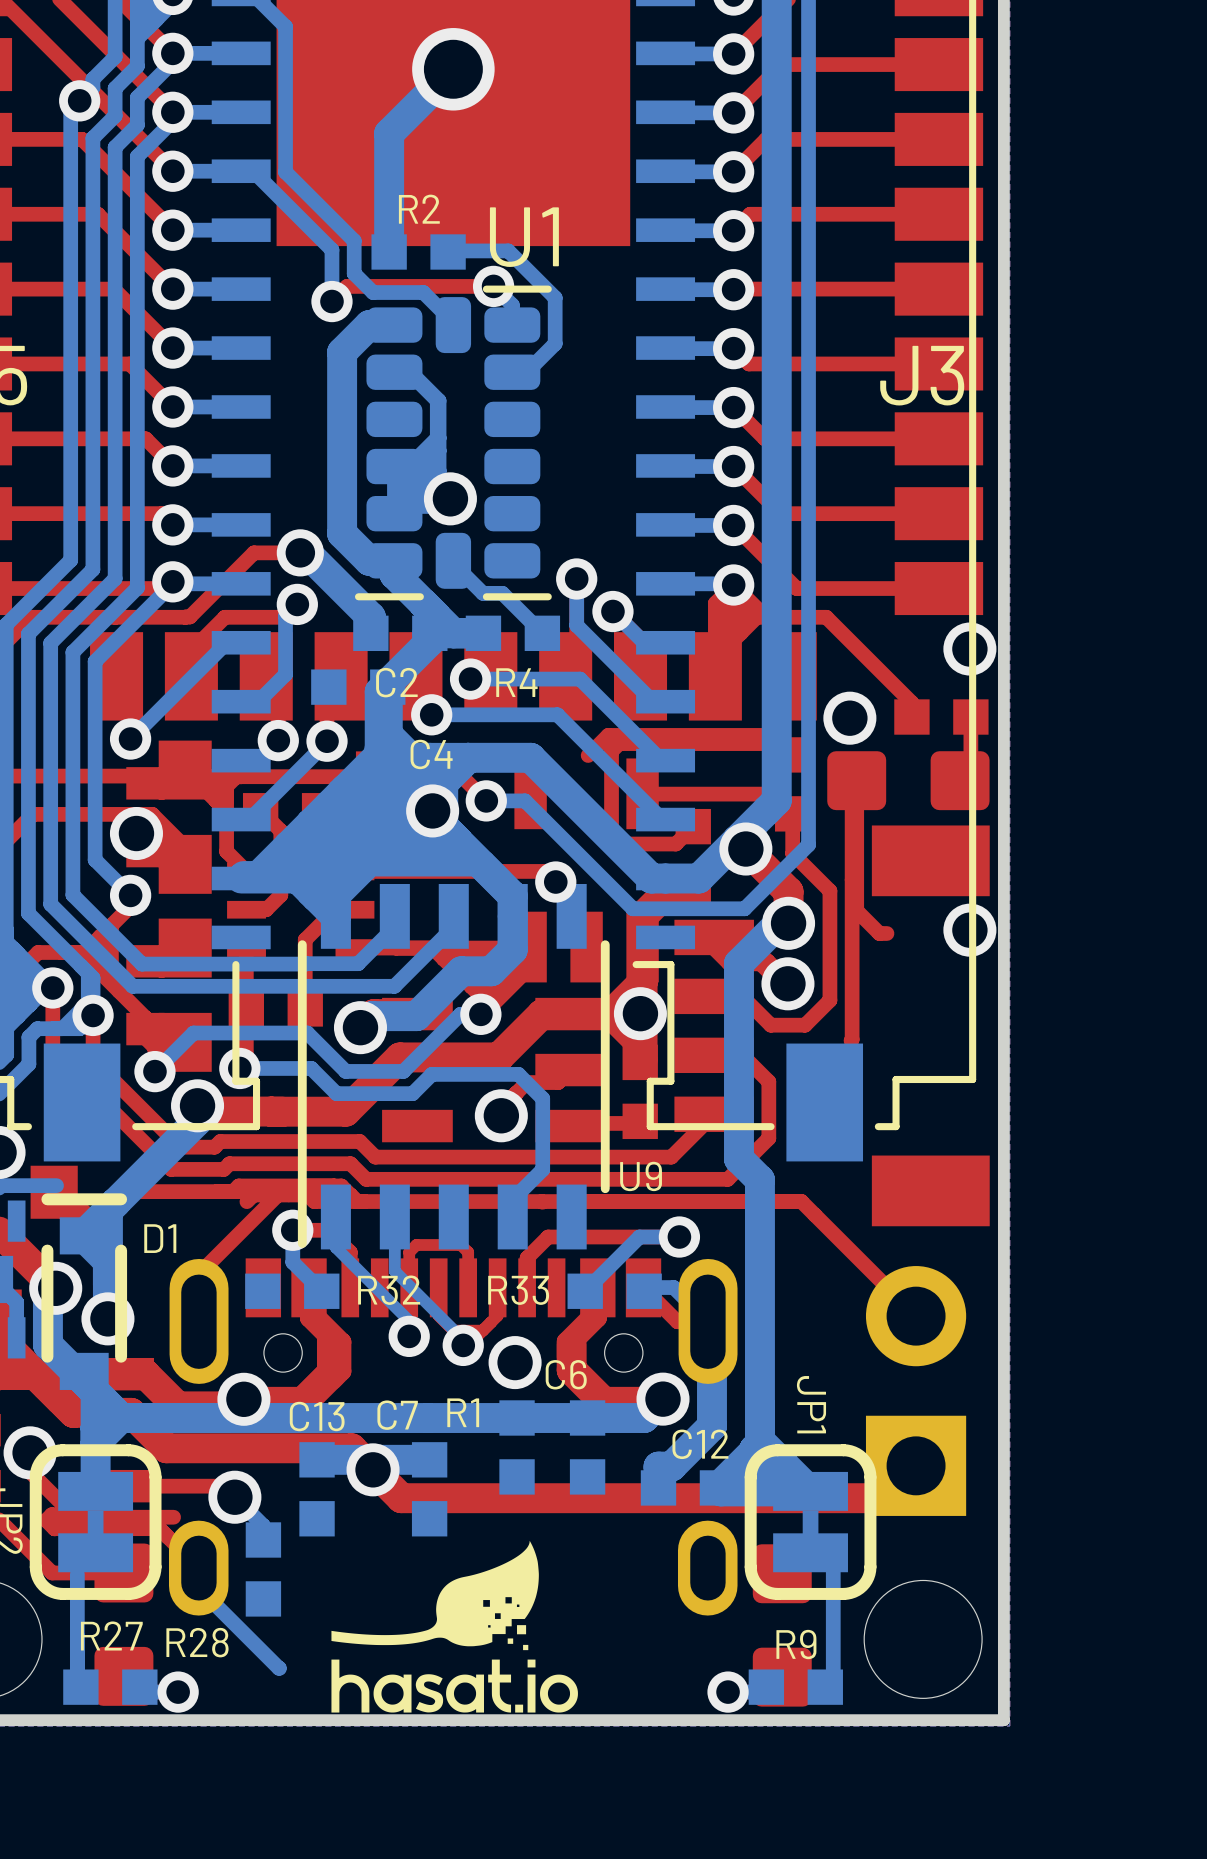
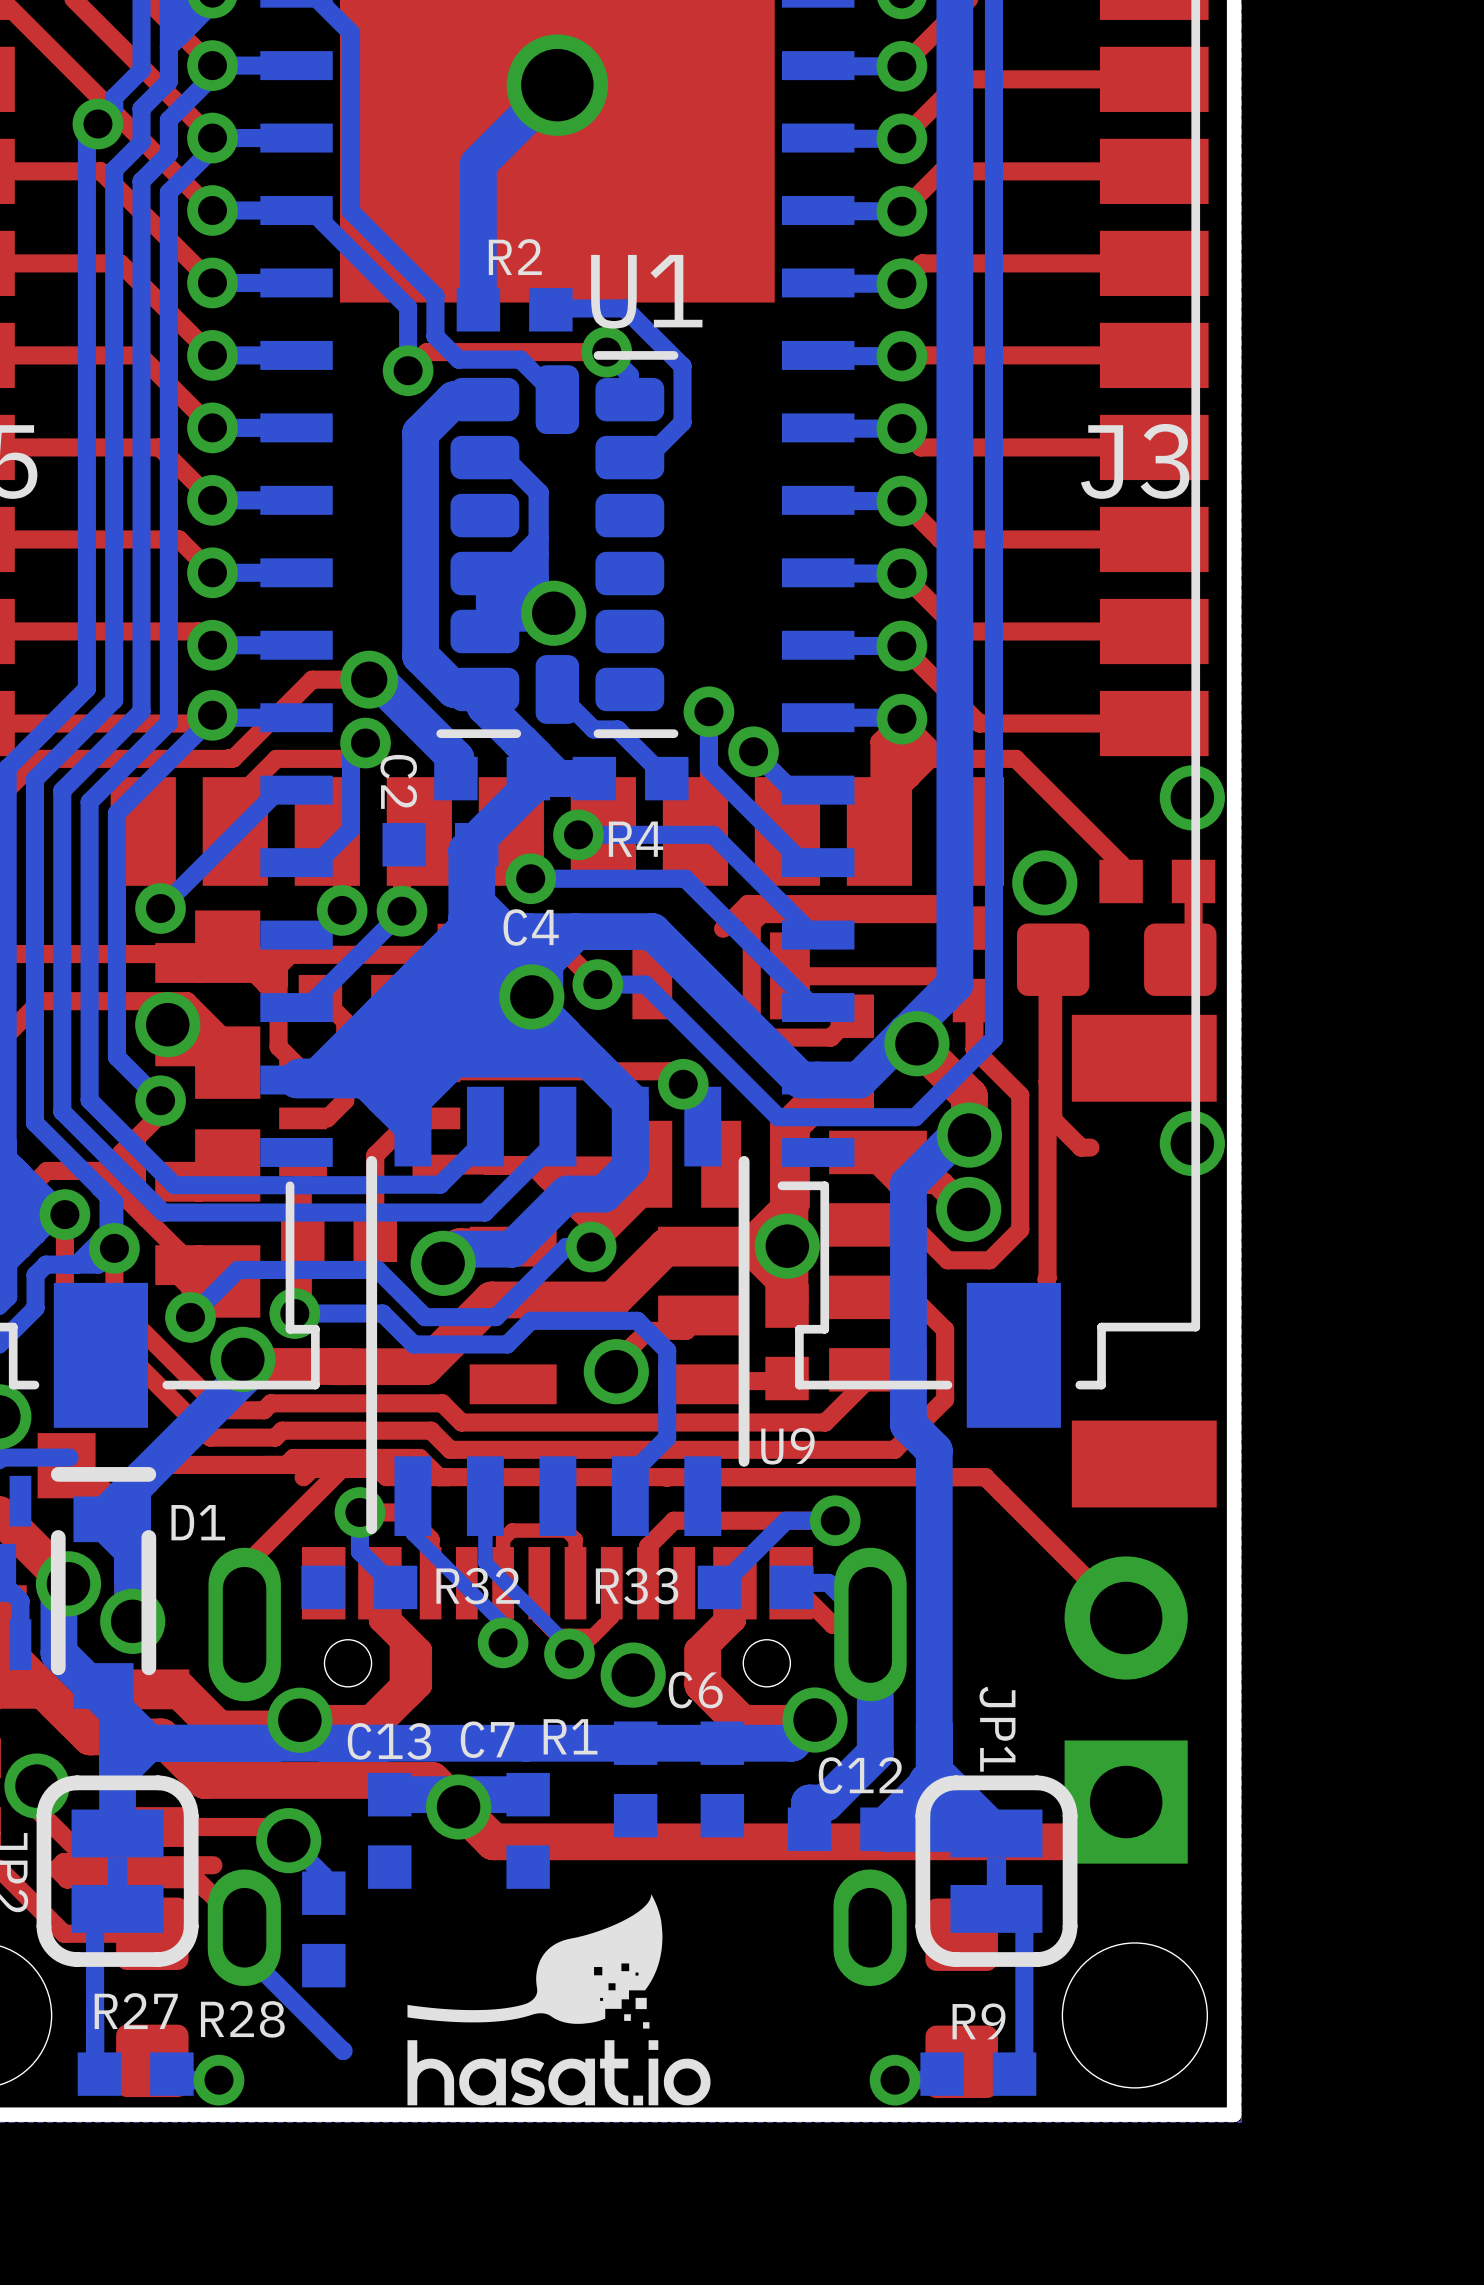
C2 name rotation: 0° (396, 682) -> 90° clockwise (398, 781)
C2 name position: C2 (396, 682) -> C2 (398, 781)

